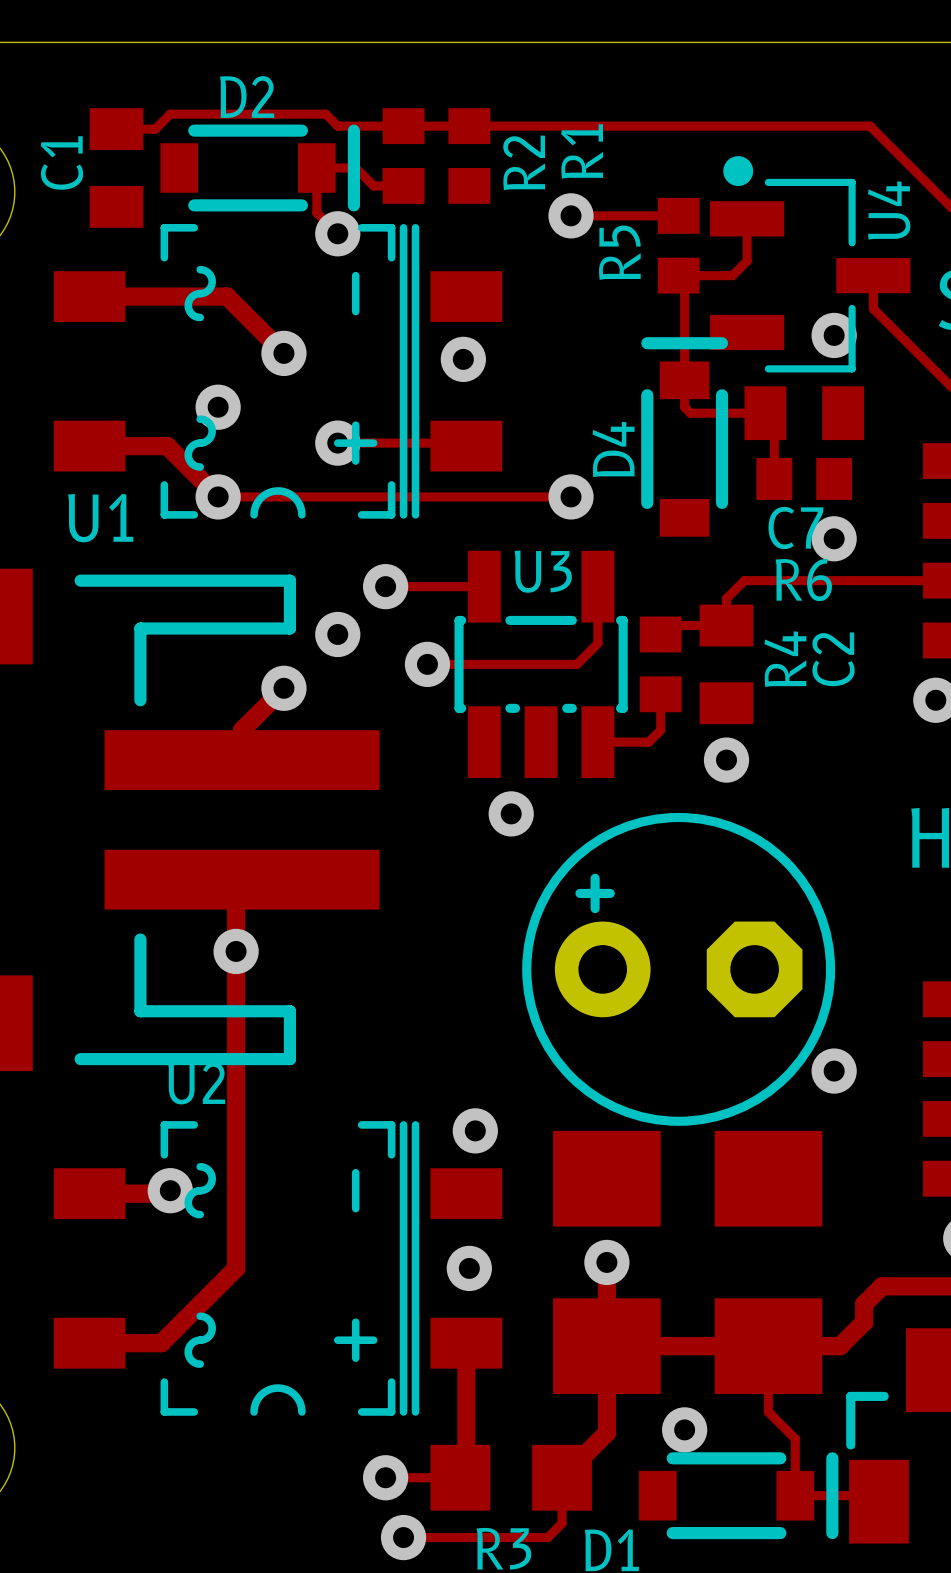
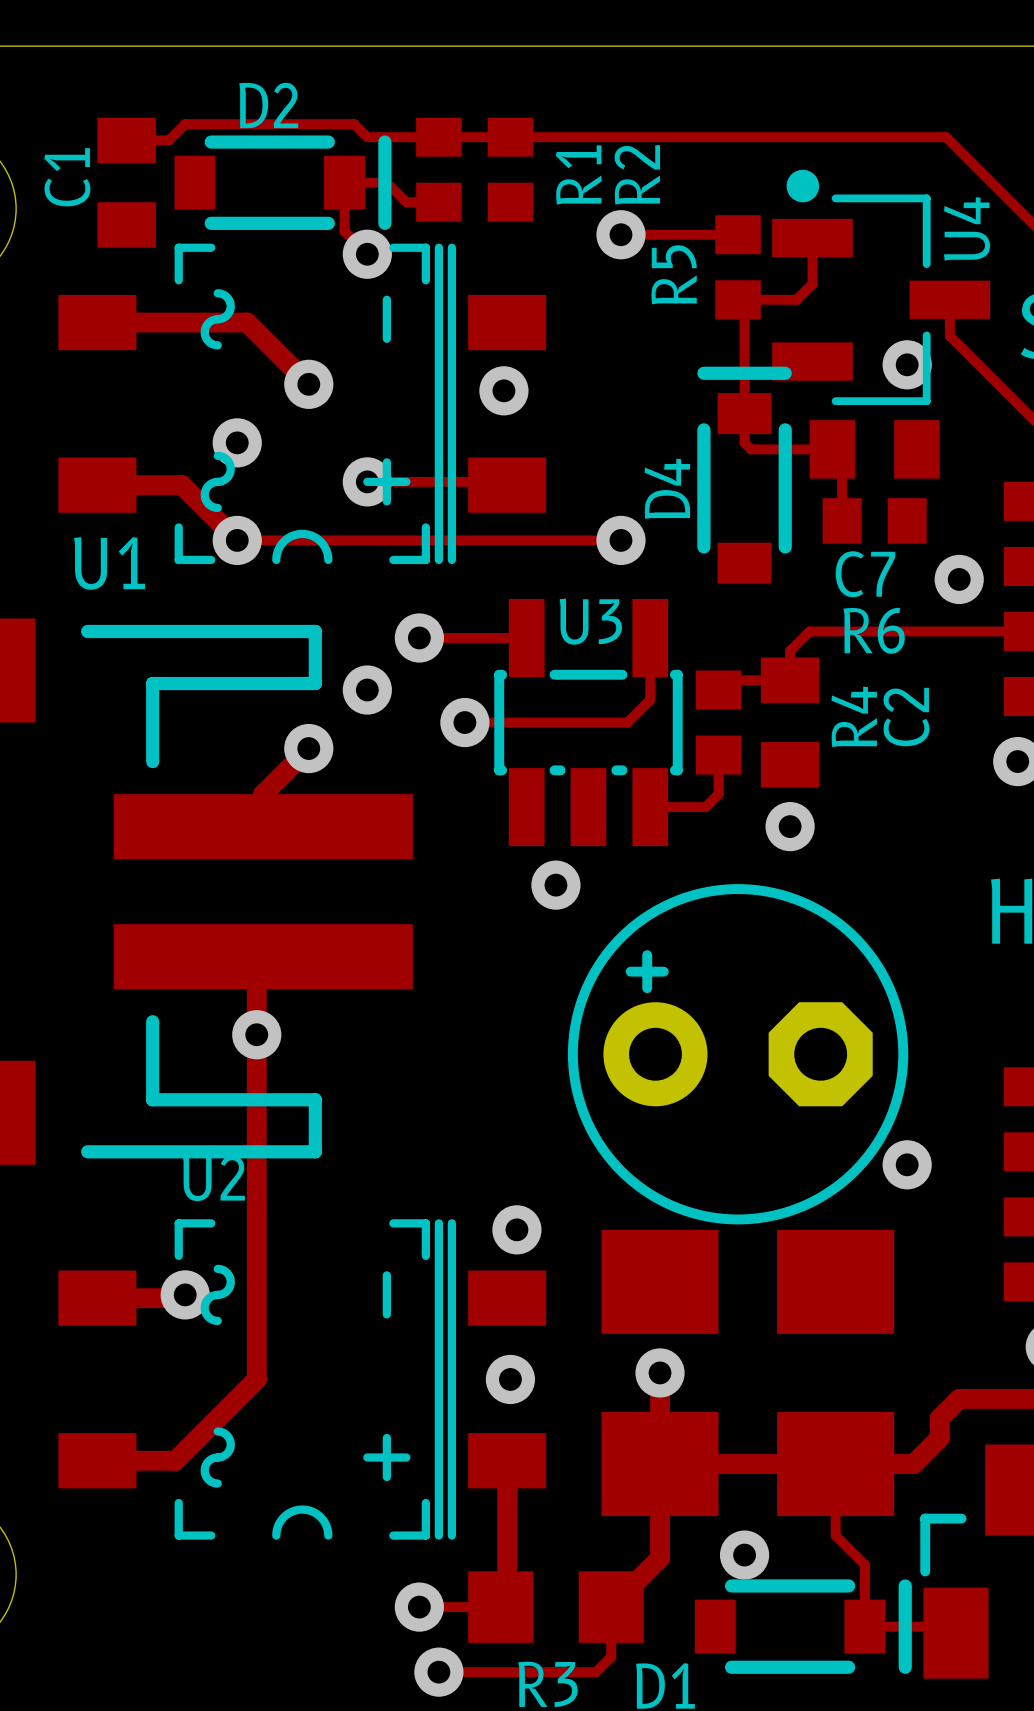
R1 name position: R1 (582, 151) -> R1 (578, 174)
R2 name position: R2 (524, 162) -> R2 (637, 174)
via position: (834, 538) -> (959, 579)

